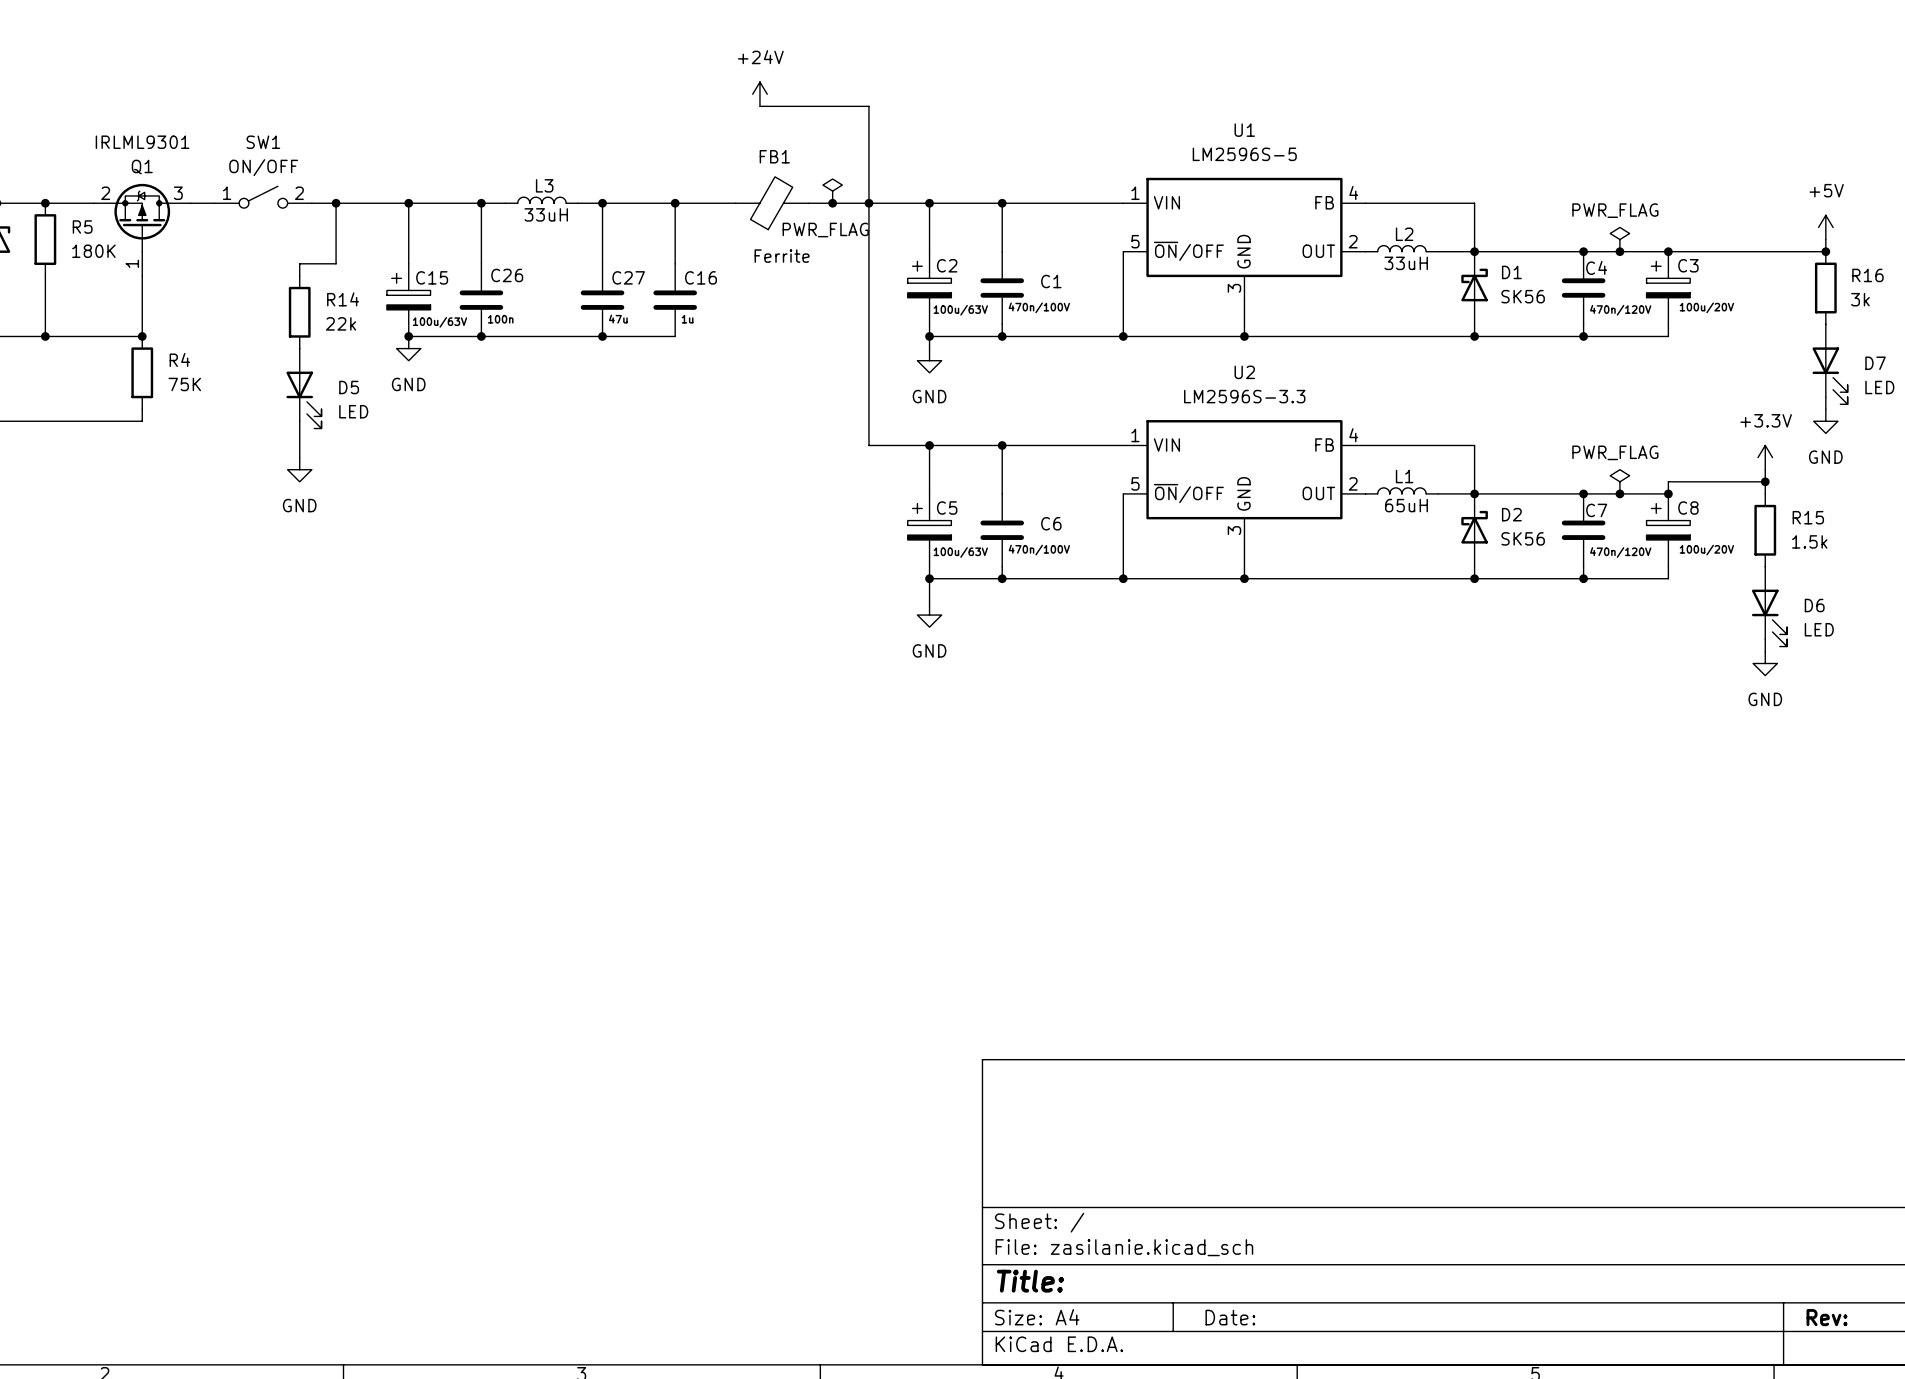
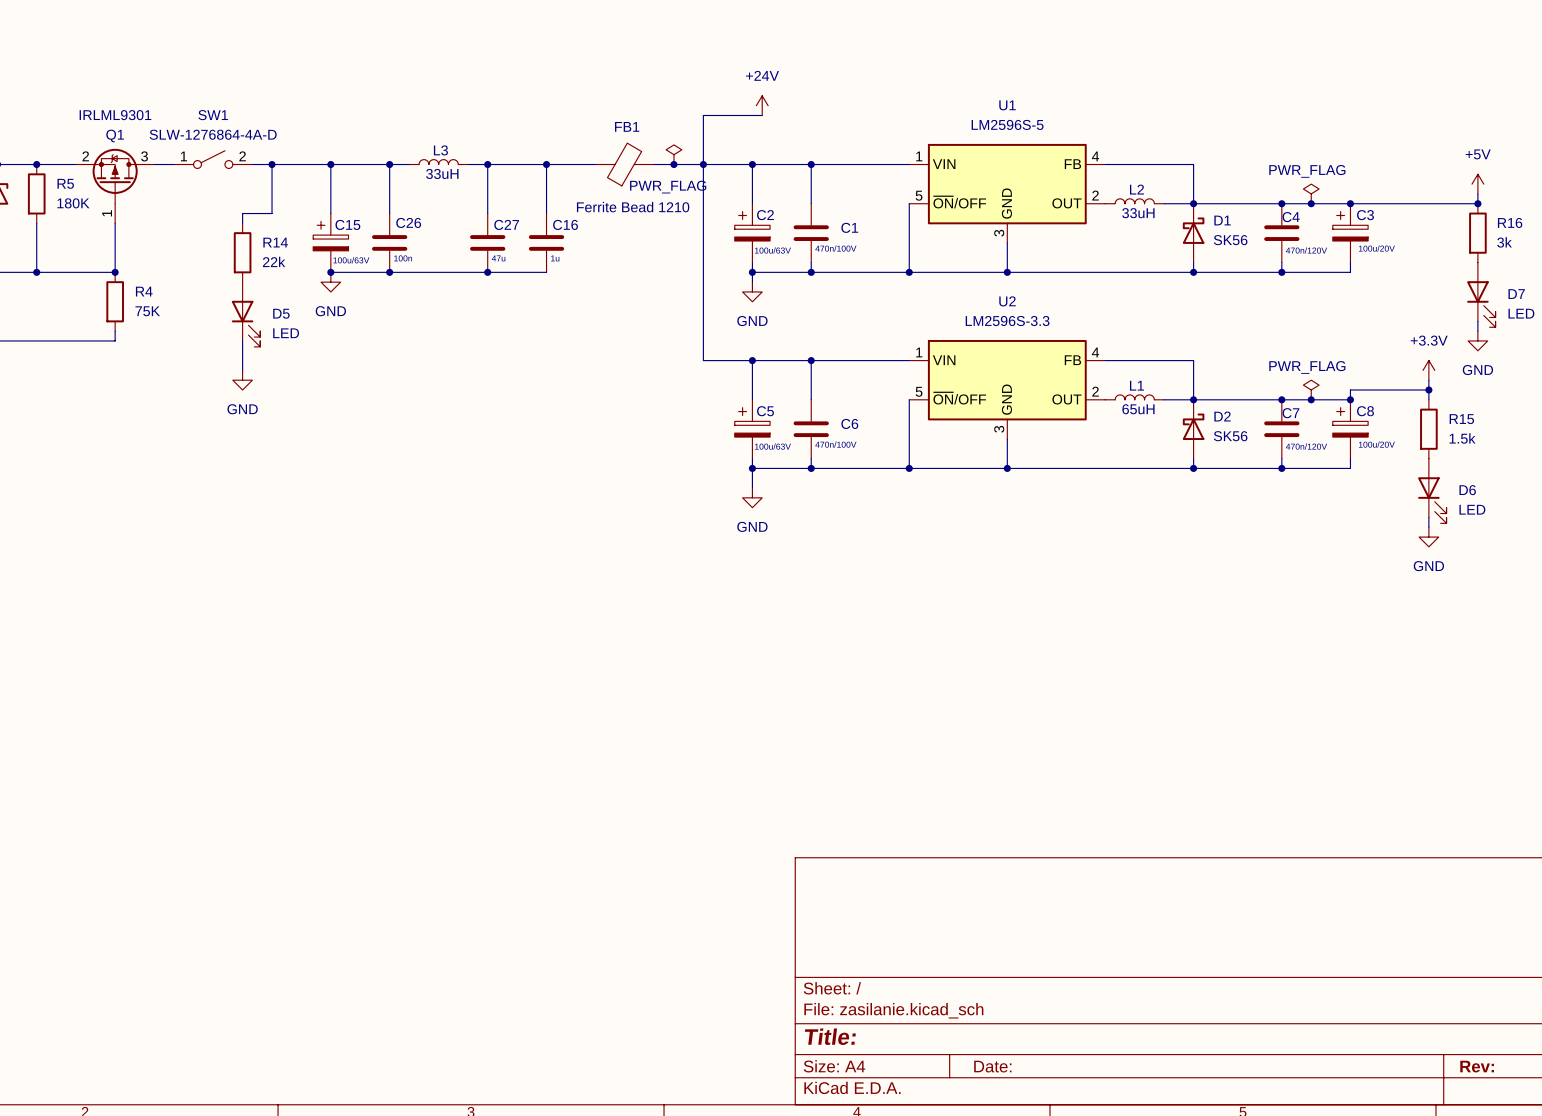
power symbol position: +24V (759, 94) -> +24V (762, 105)
wire: (759, 106) (868, 106) (868, 142) -> (762, 115) (703, 115)
SW1 value: ON/OFF (263, 167) -> SLW-1276864-4A-D (213, 134)
FB1 value: Ferrite (782, 256) -> Ferrite Bead 1210 (633, 207)

